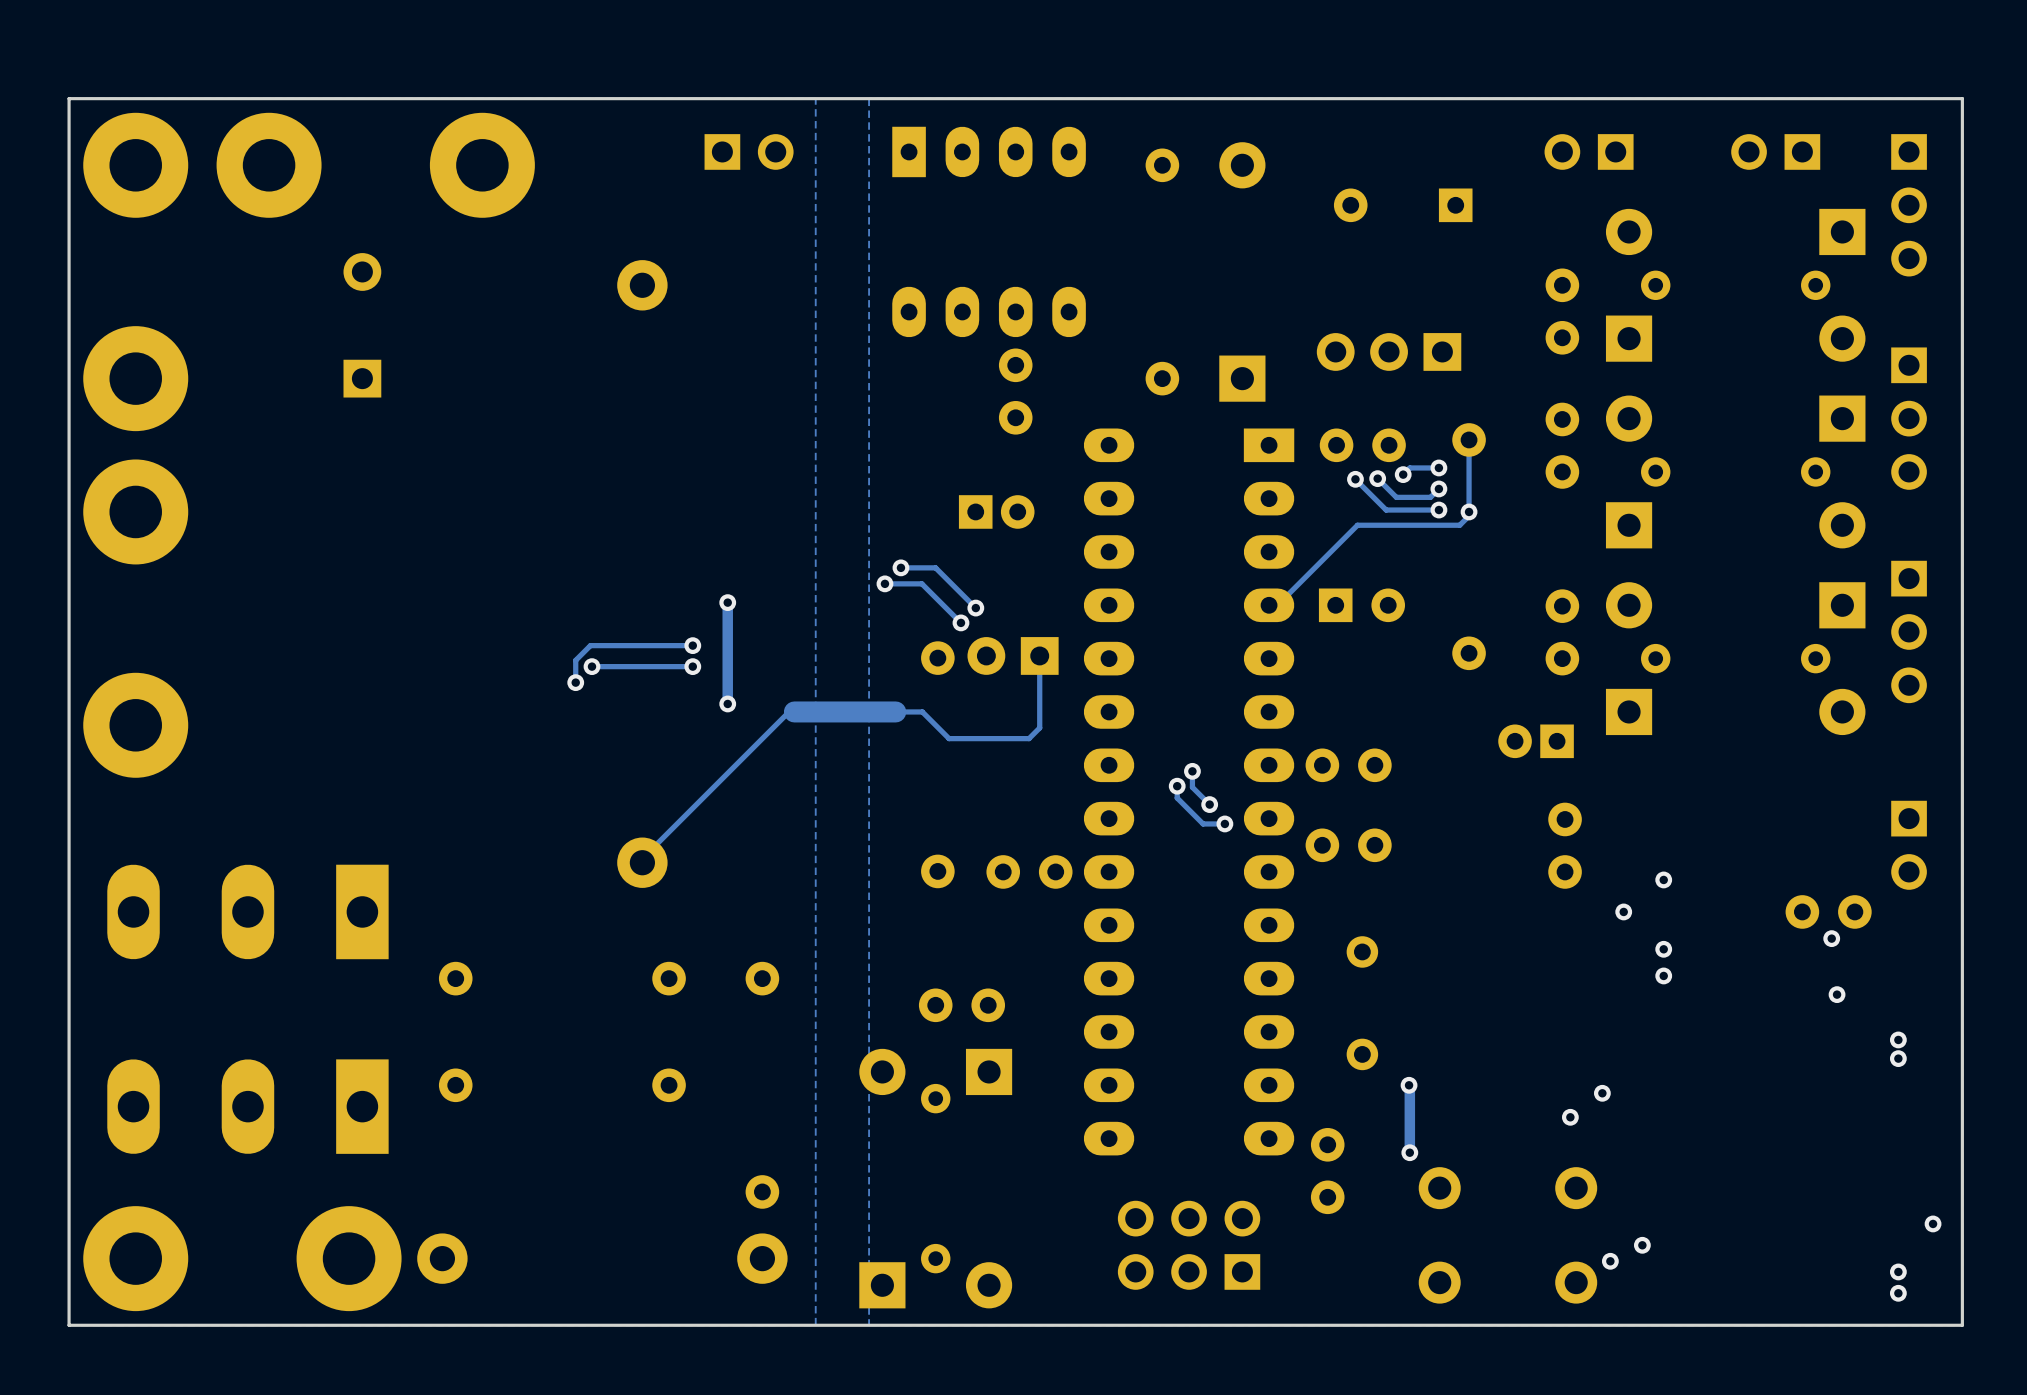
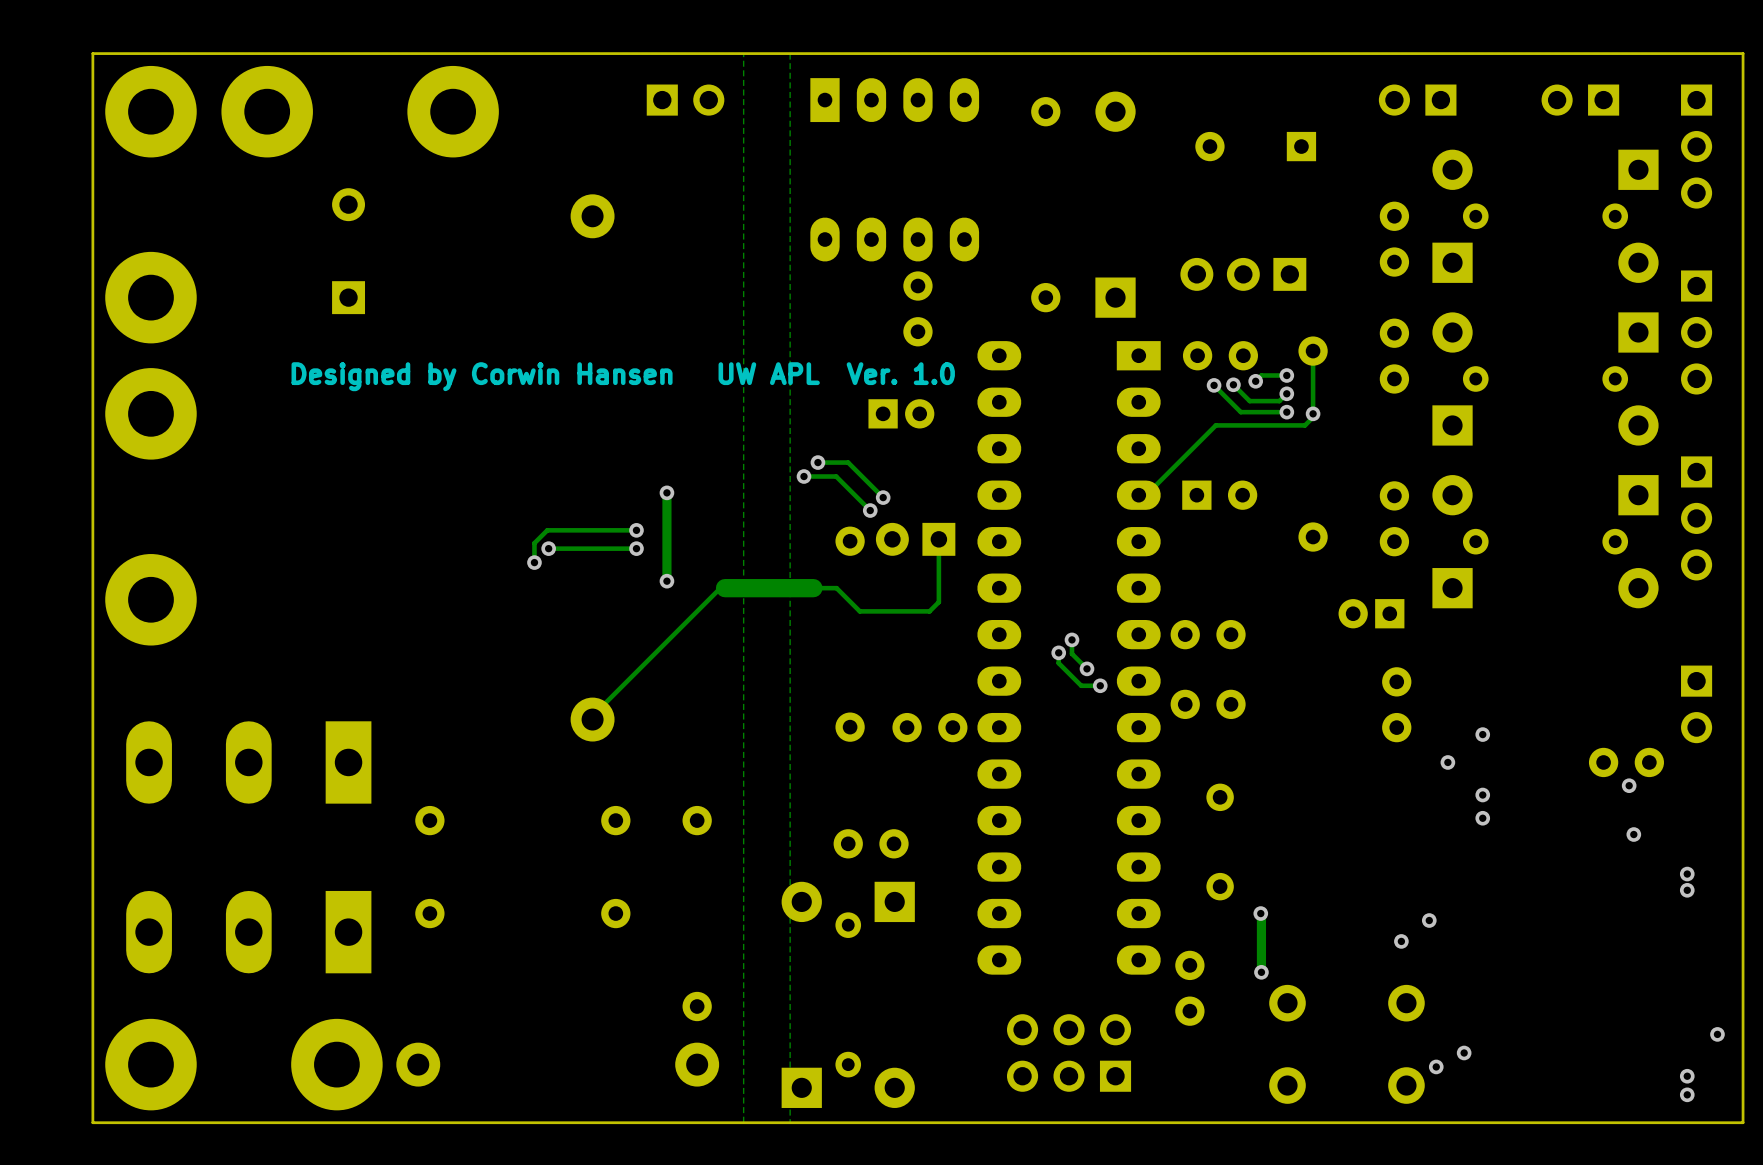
text: none -> Designed by Corwin Hansen UW APL Ver. 1.0 (623, 376)

